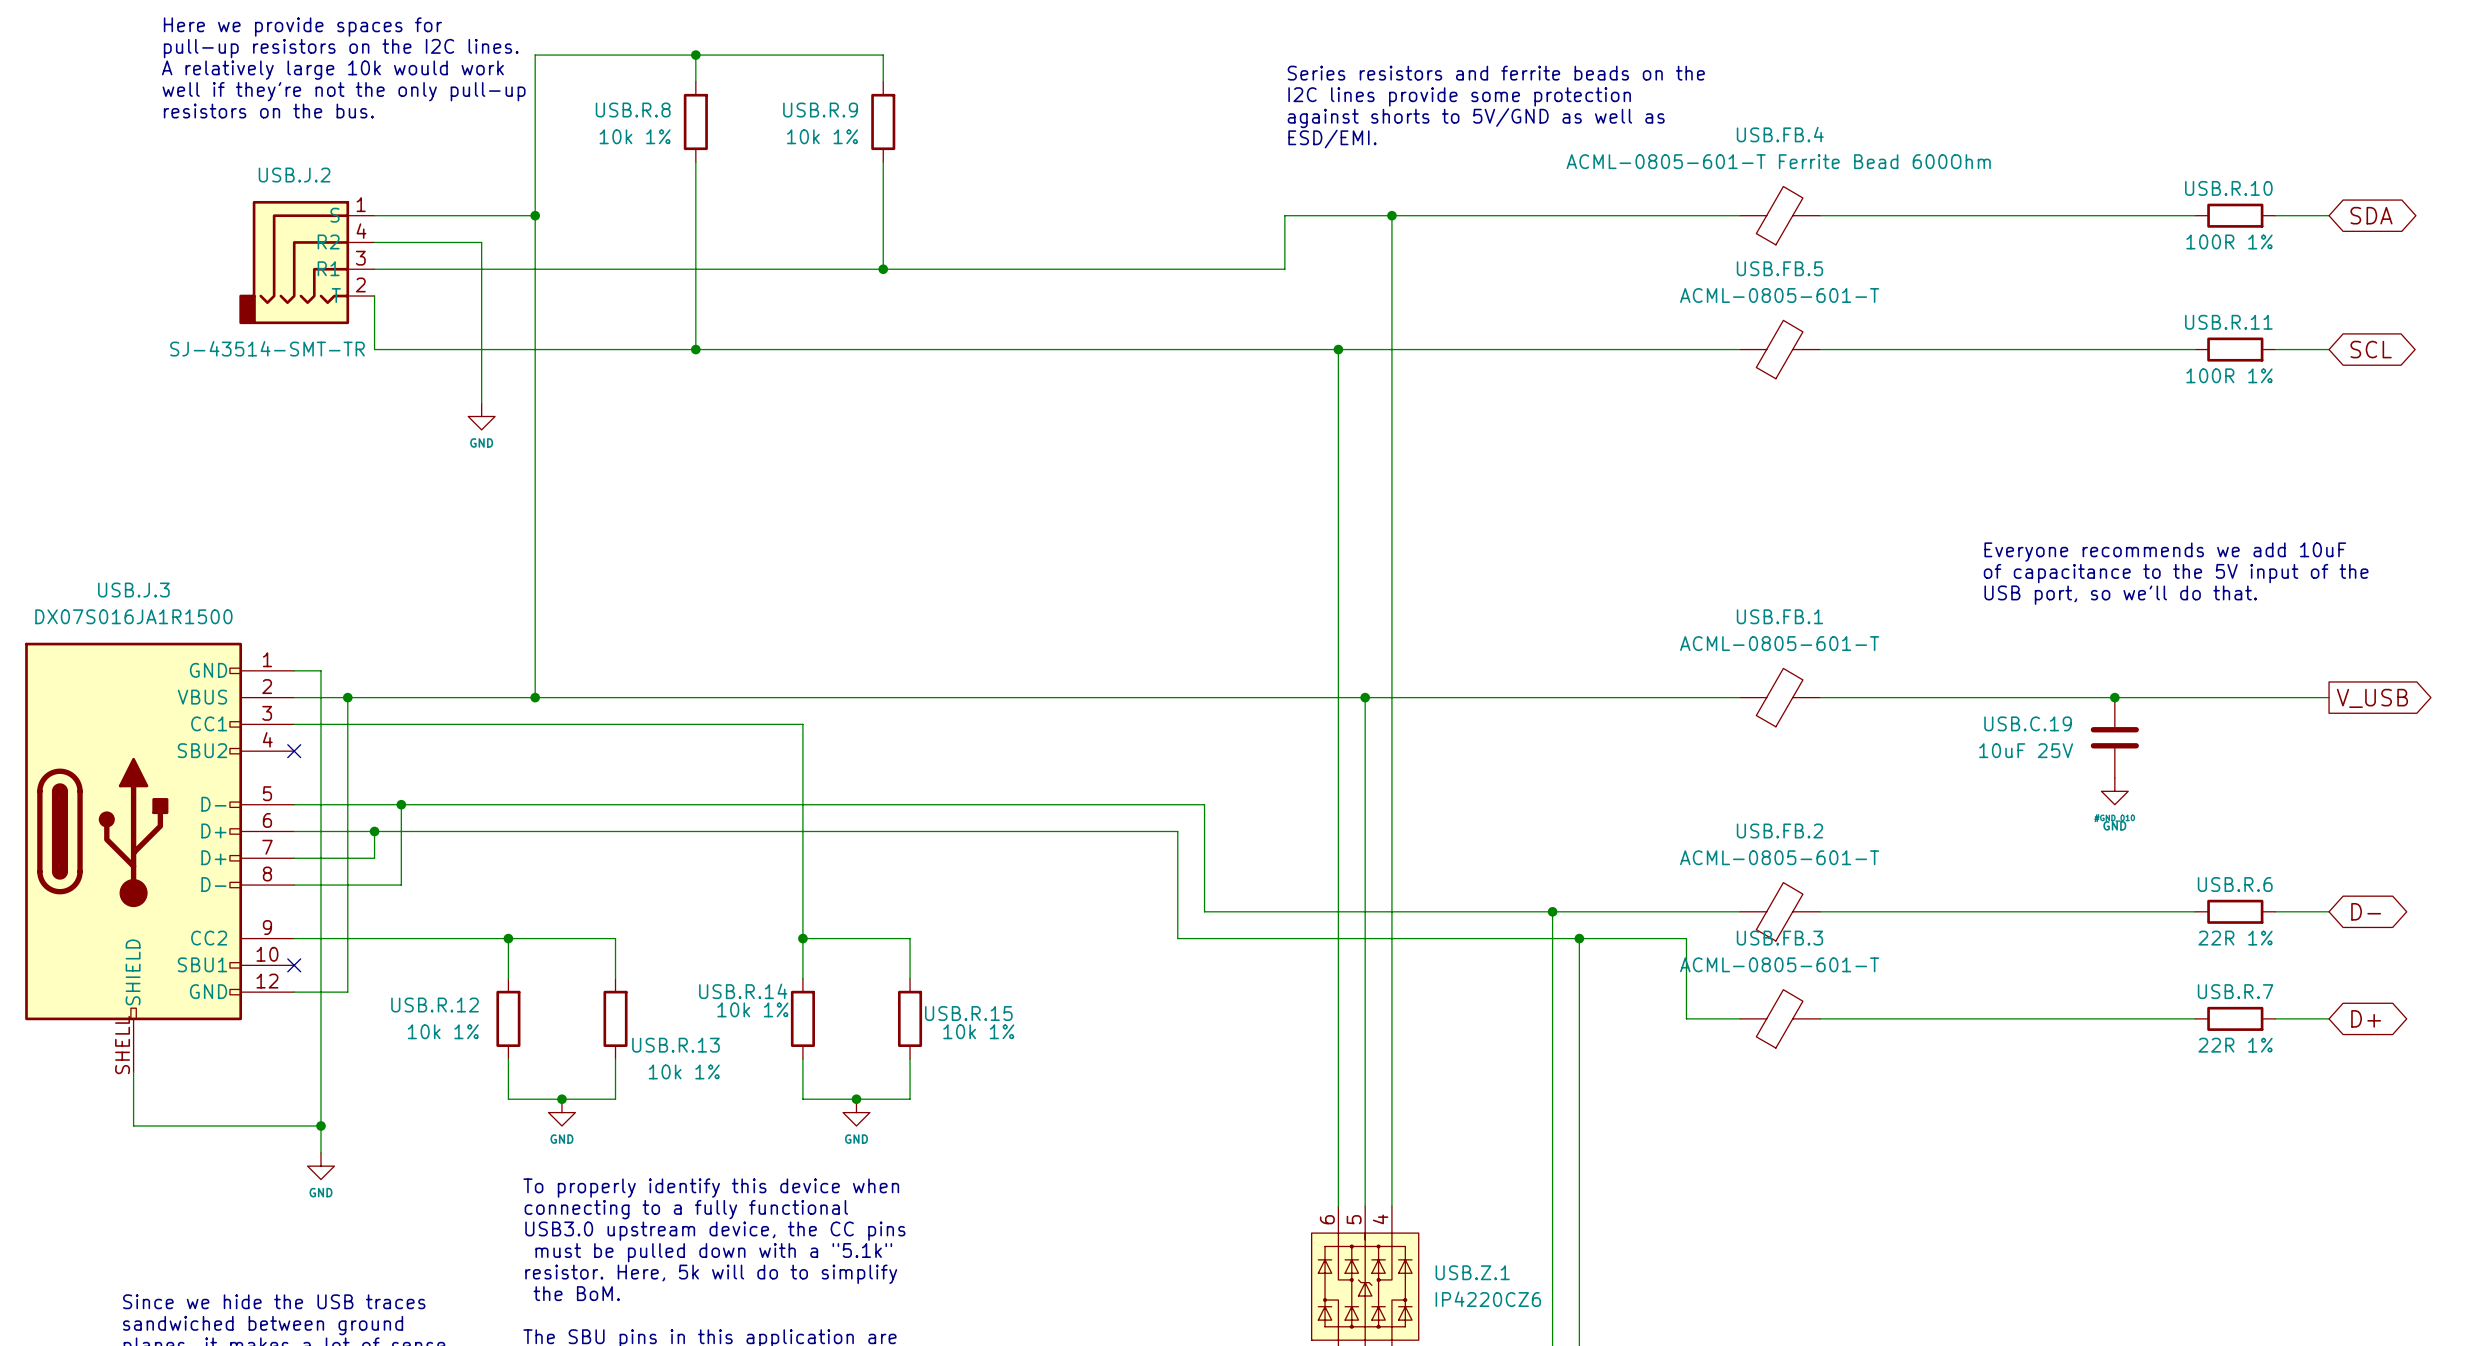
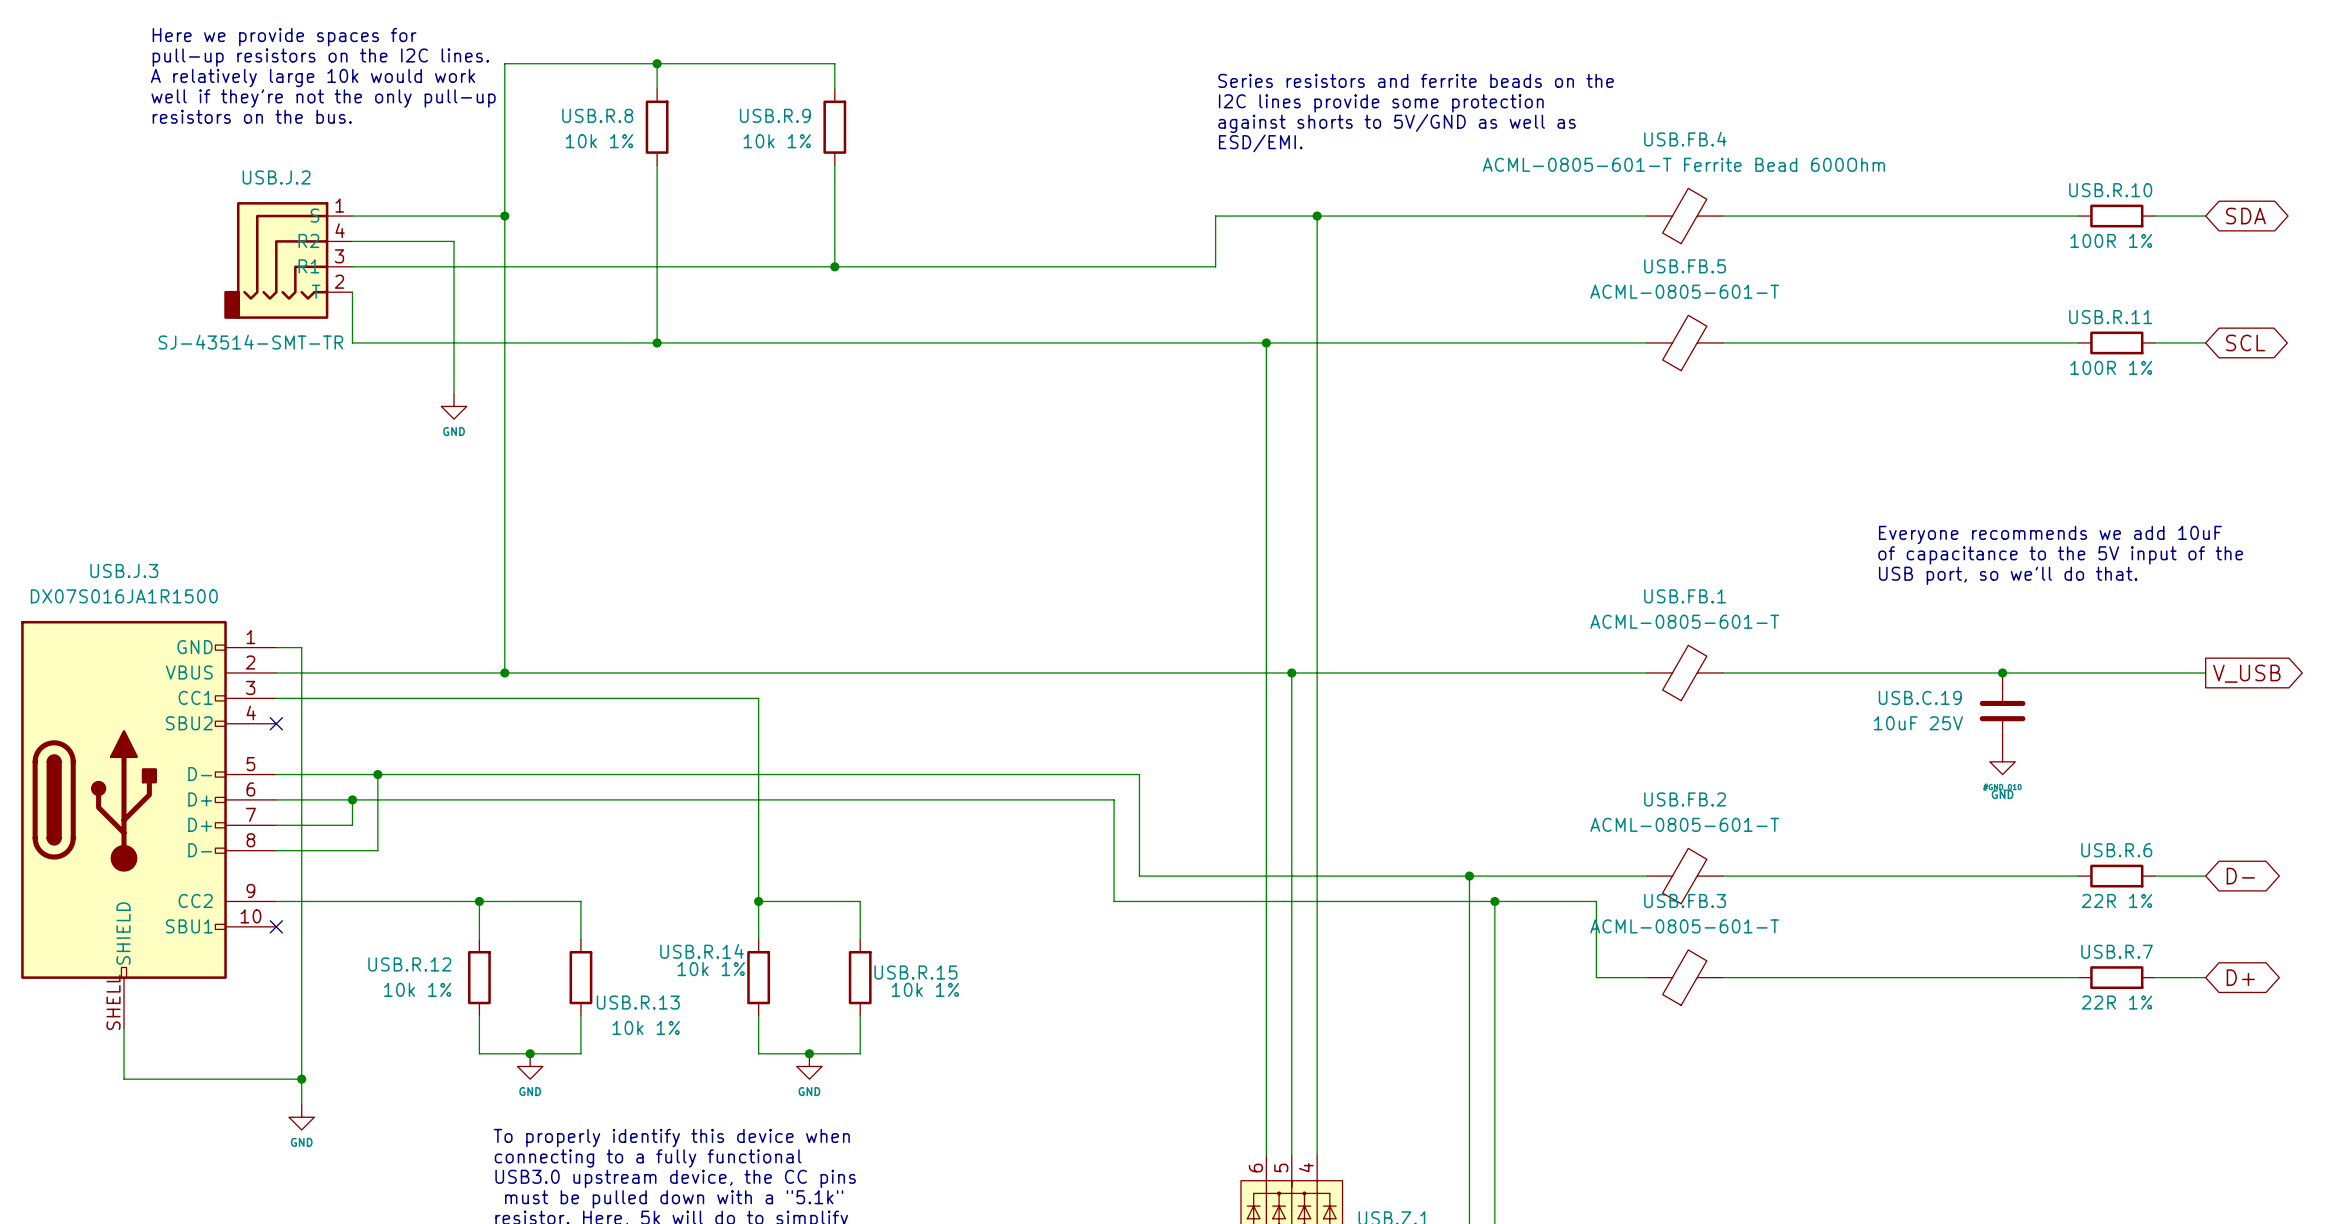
USB.J.3 symbol: [25, 642, 295, 1073] -> [21, 620, 277, 1029]
wire: (347, 697) (347, 992) (294, 992) -> none
junction: (347, 697) -> none

